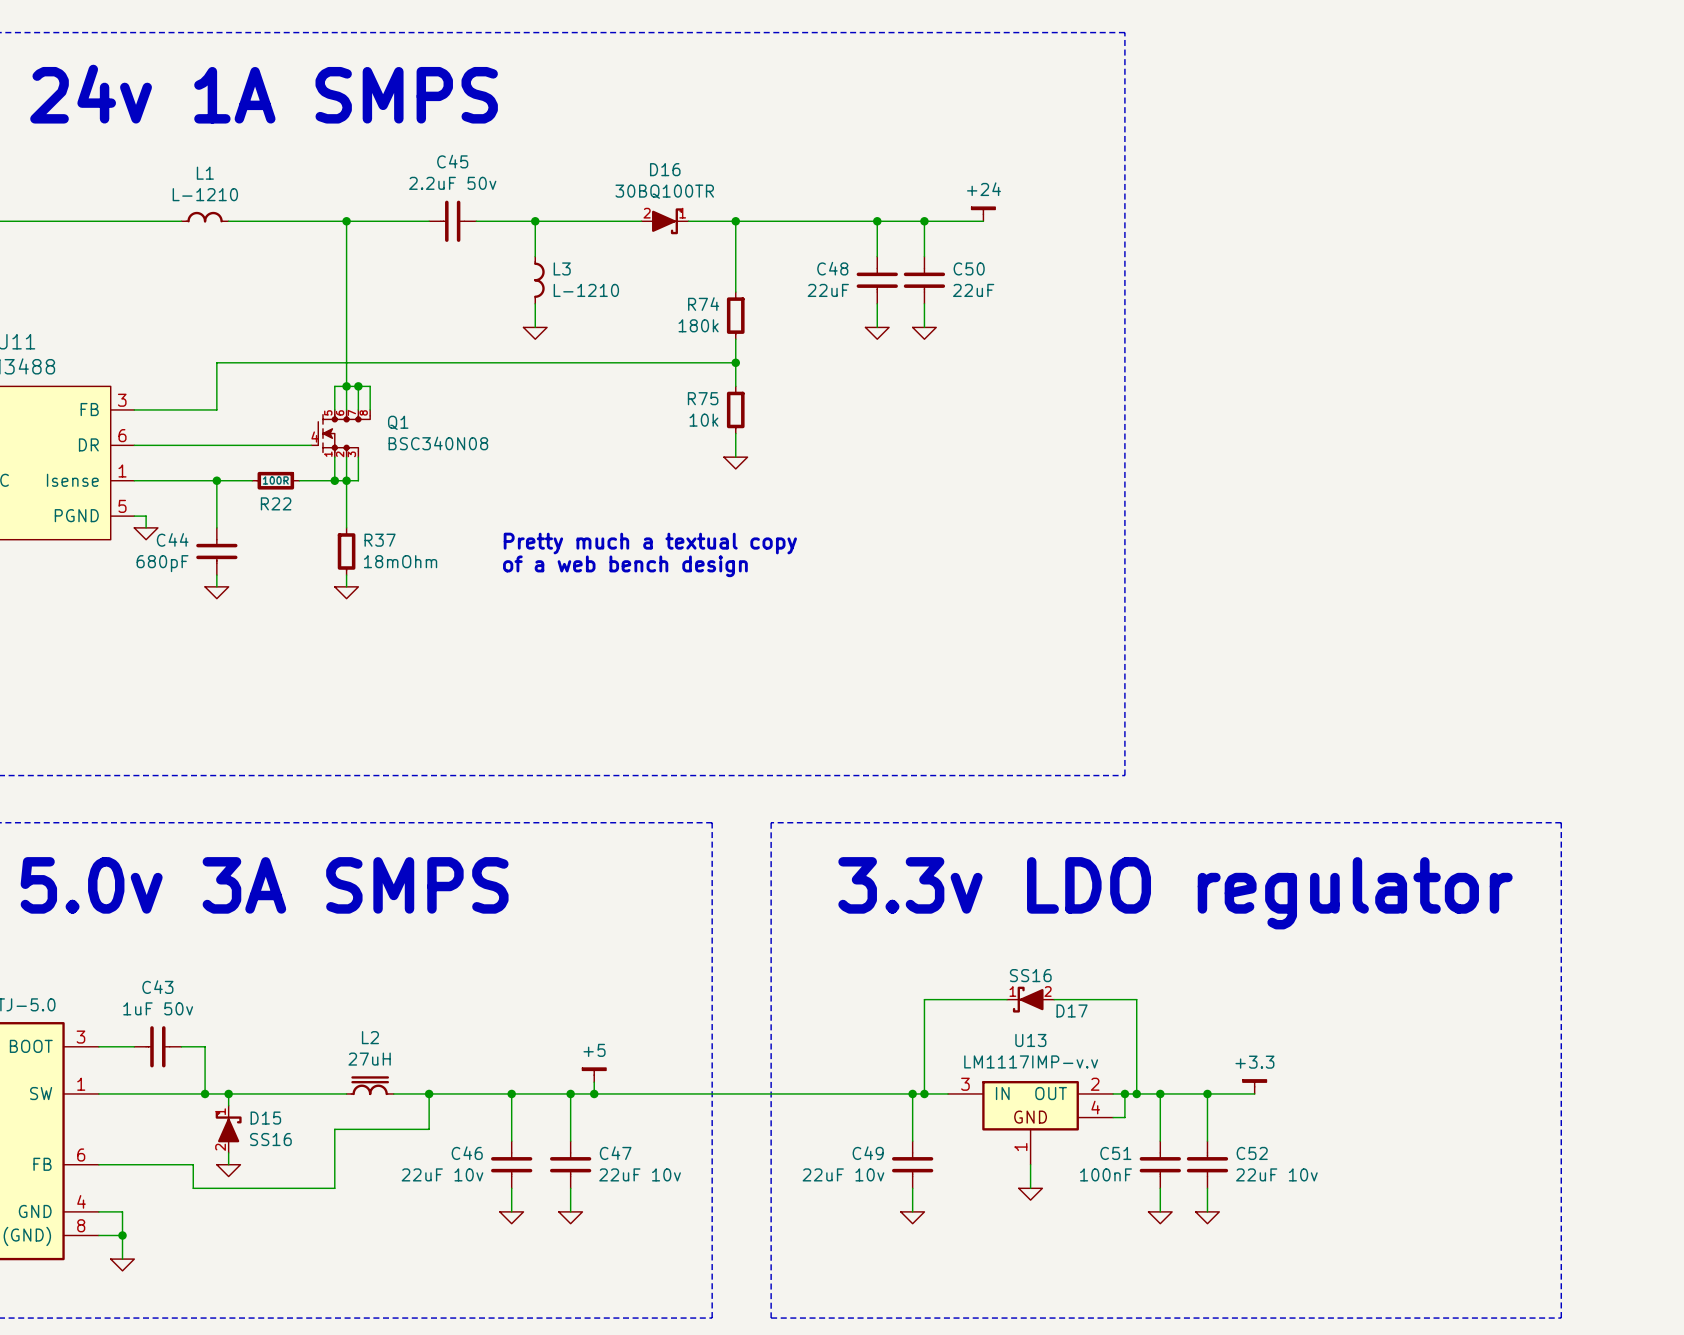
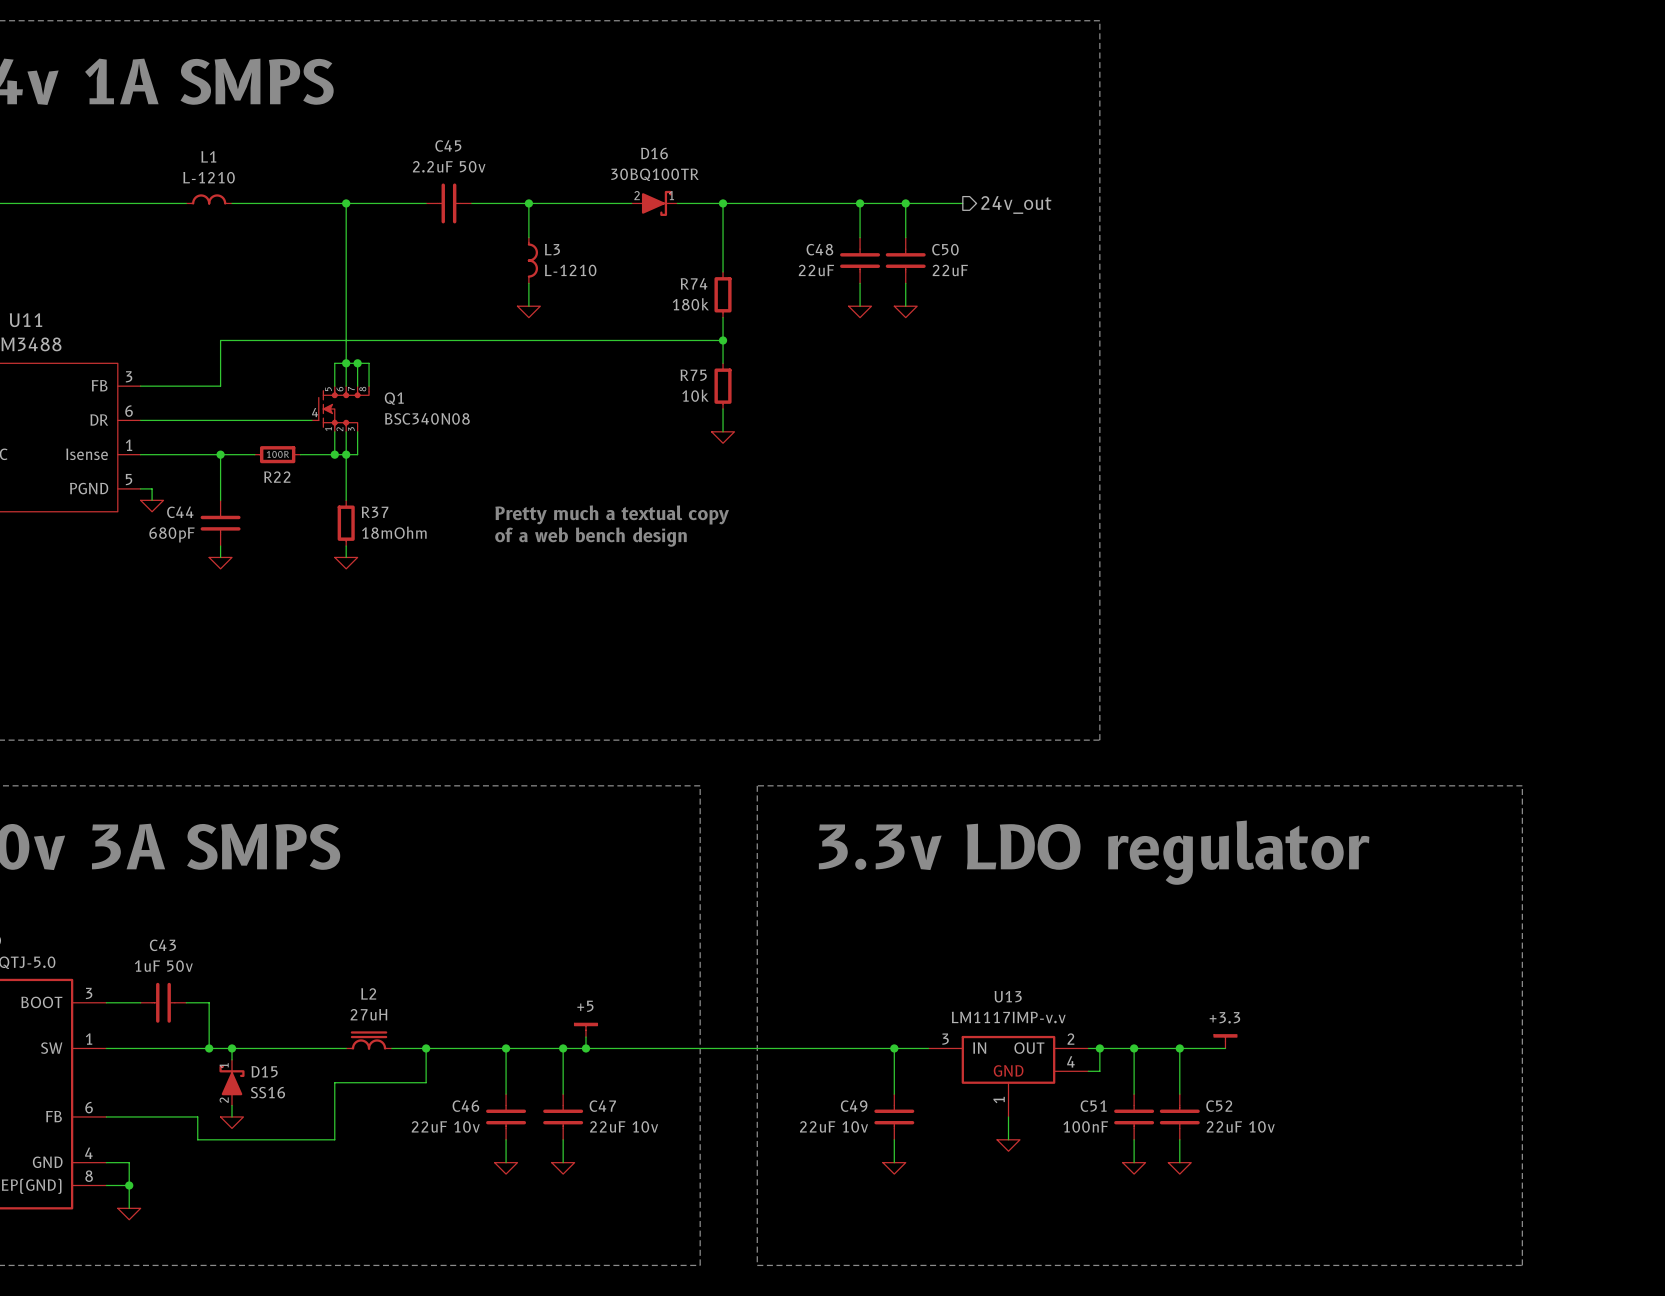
power symbol: +24 (983, 214) -> none
hierarchical label: none -> 24v_out (1016, 204)
wire: (1006, 999) (924, 999) (924, 1093) -> none
D17: SS16 (1030, 999) -> none
wire: (1054, 999) (1136, 999) (1136, 1093) -> none
junction: (924, 1093) -> none
junction: (1136, 1093) -> none

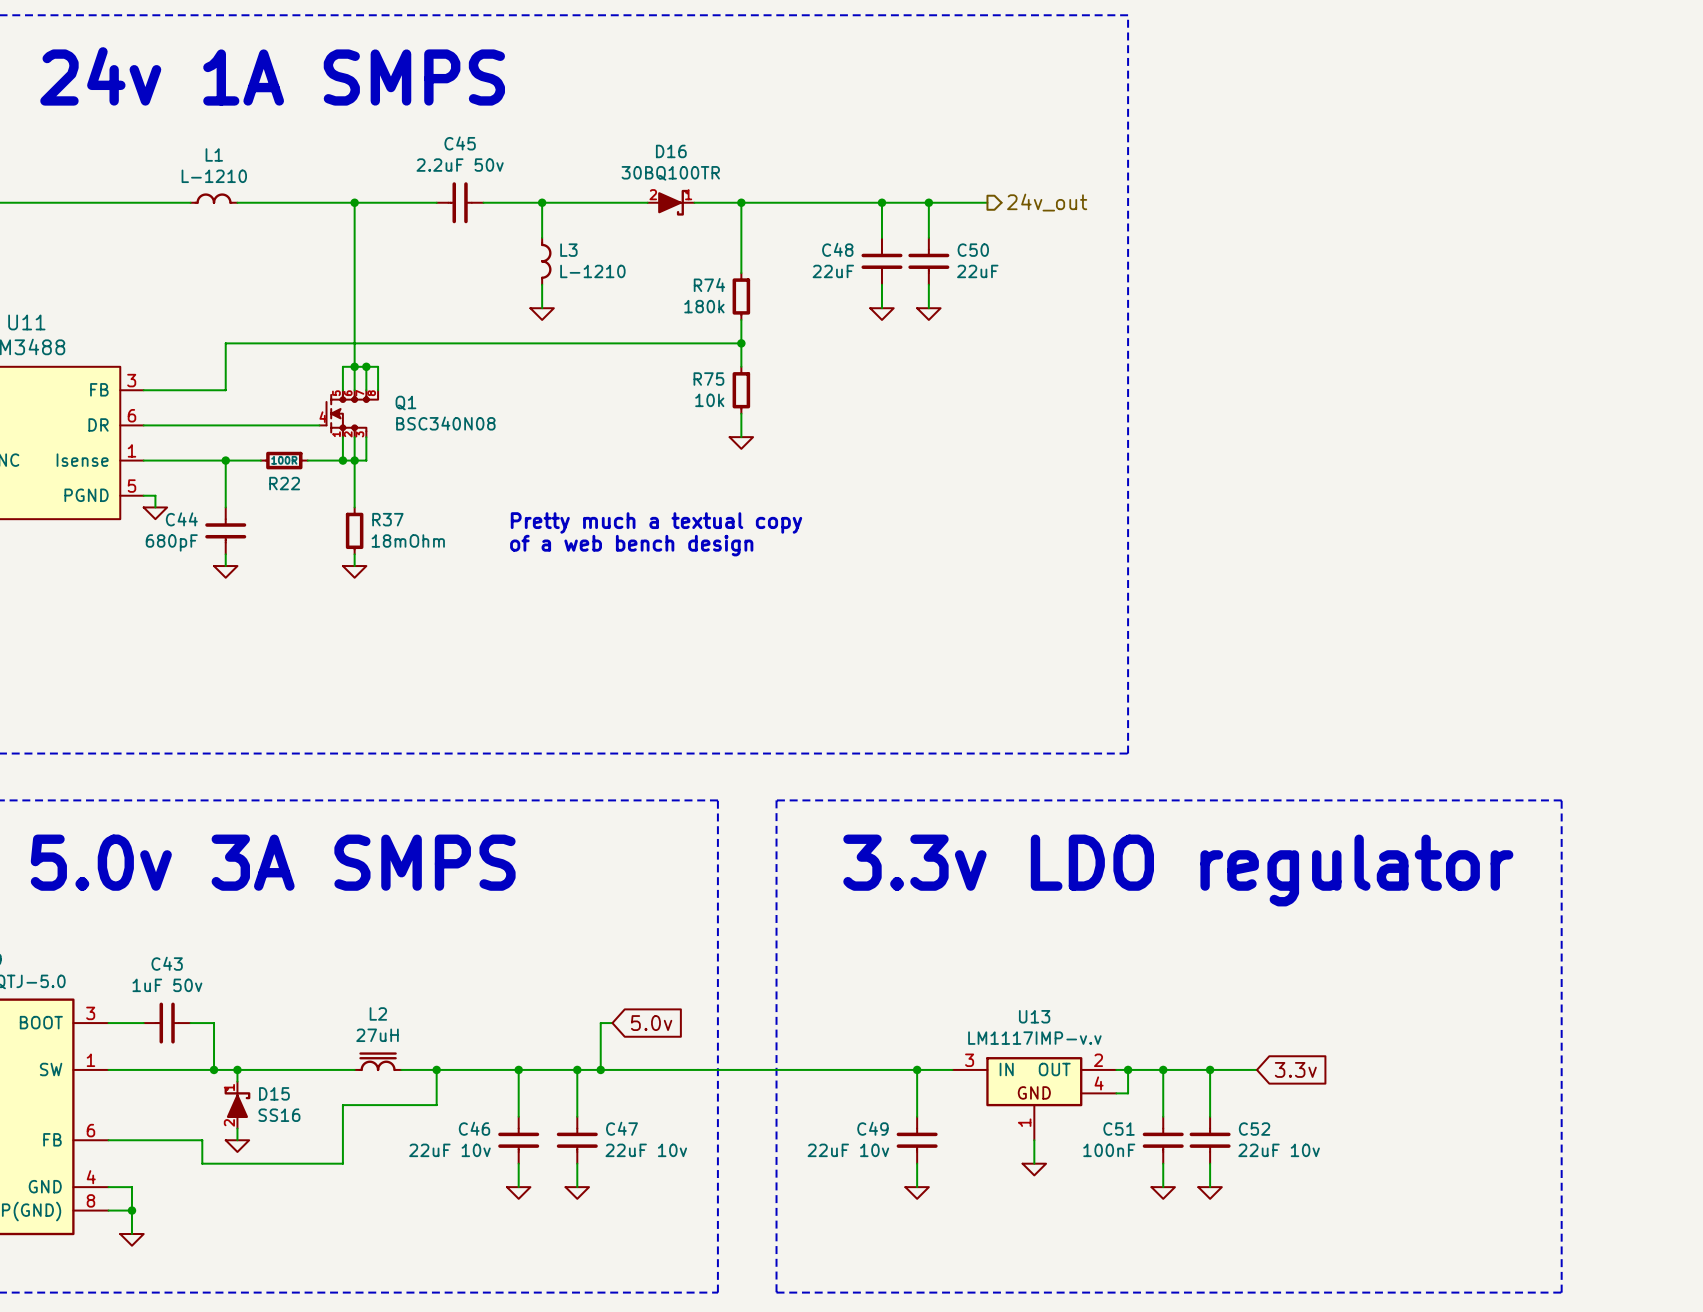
wire: none -> (612, 1023) (600, 1023) (600, 1058)
global label: none -> 5.0v (651, 1023)
power symbol: +5 (585, 1030) -> none
power symbol: +3.3 (1225, 1041) -> none
global label: none -> 3.3v (1295, 1069)

